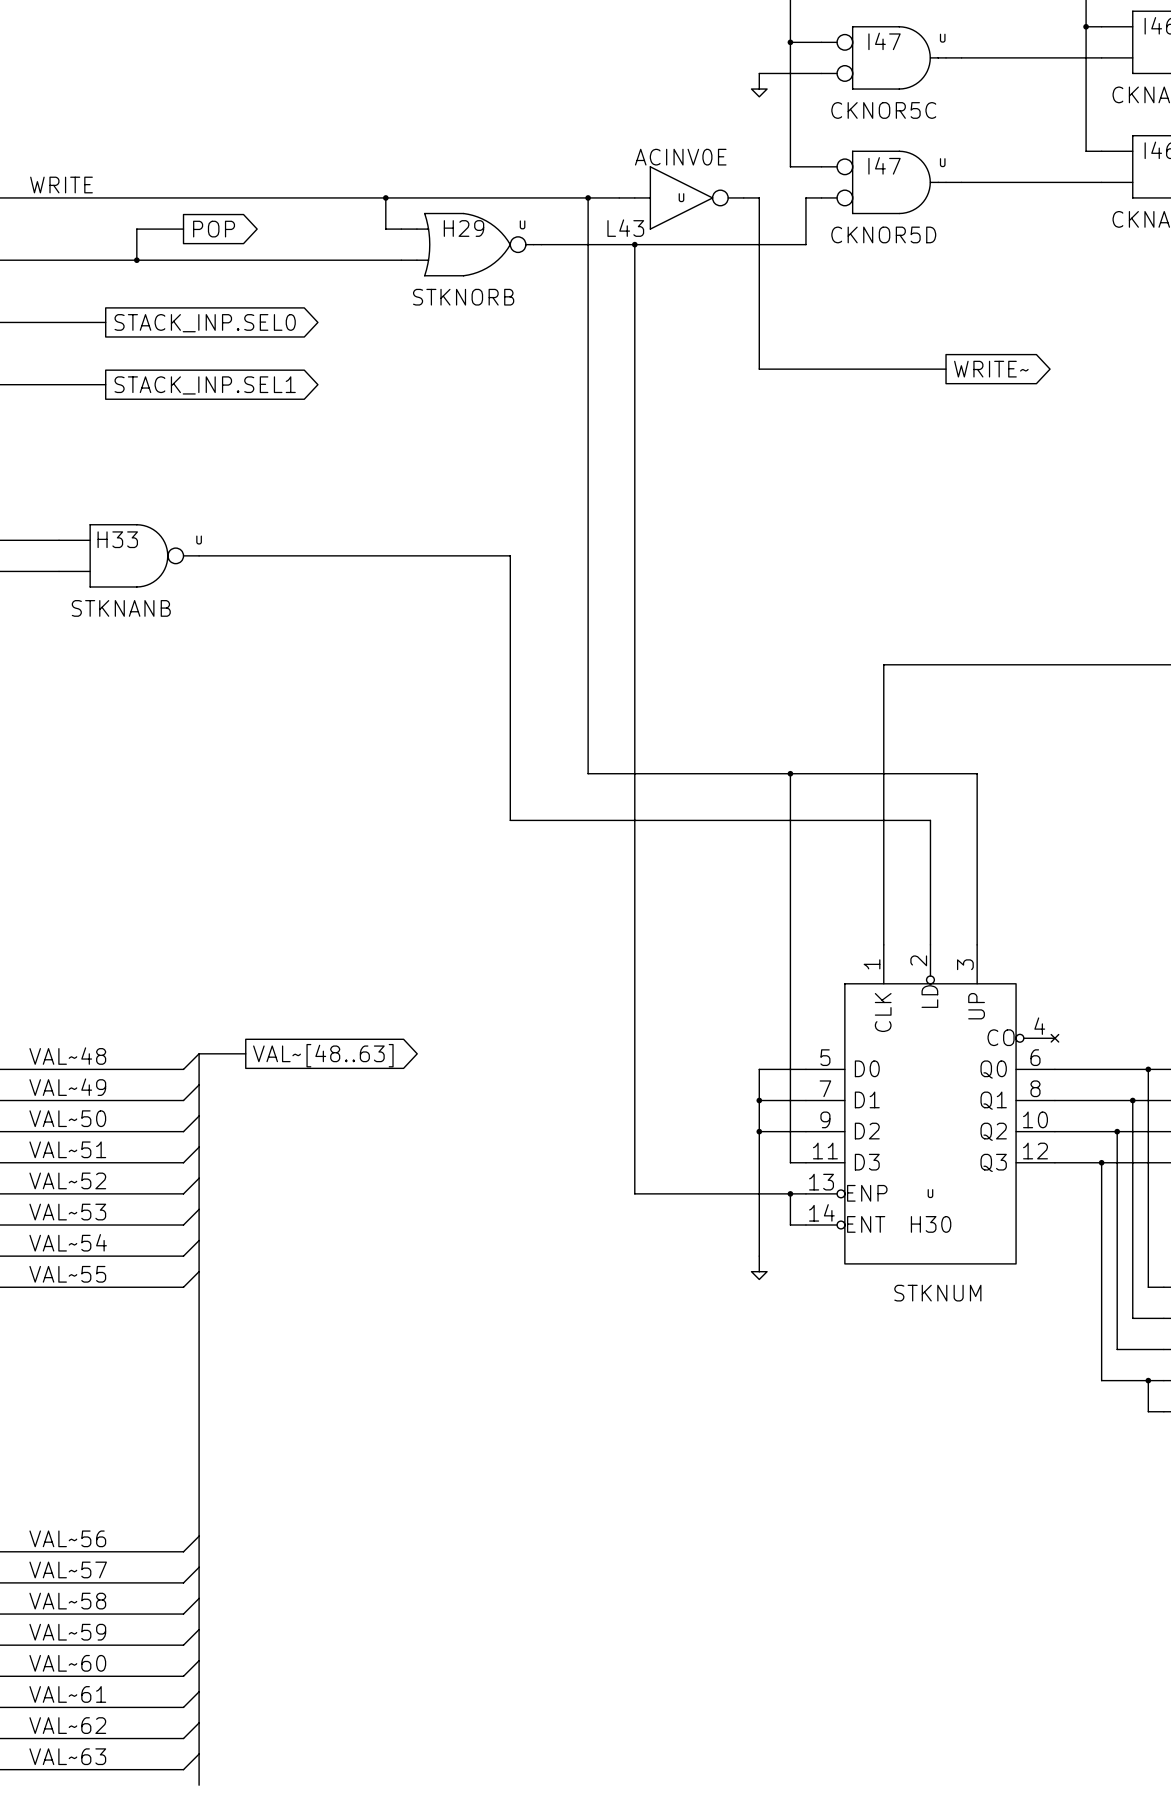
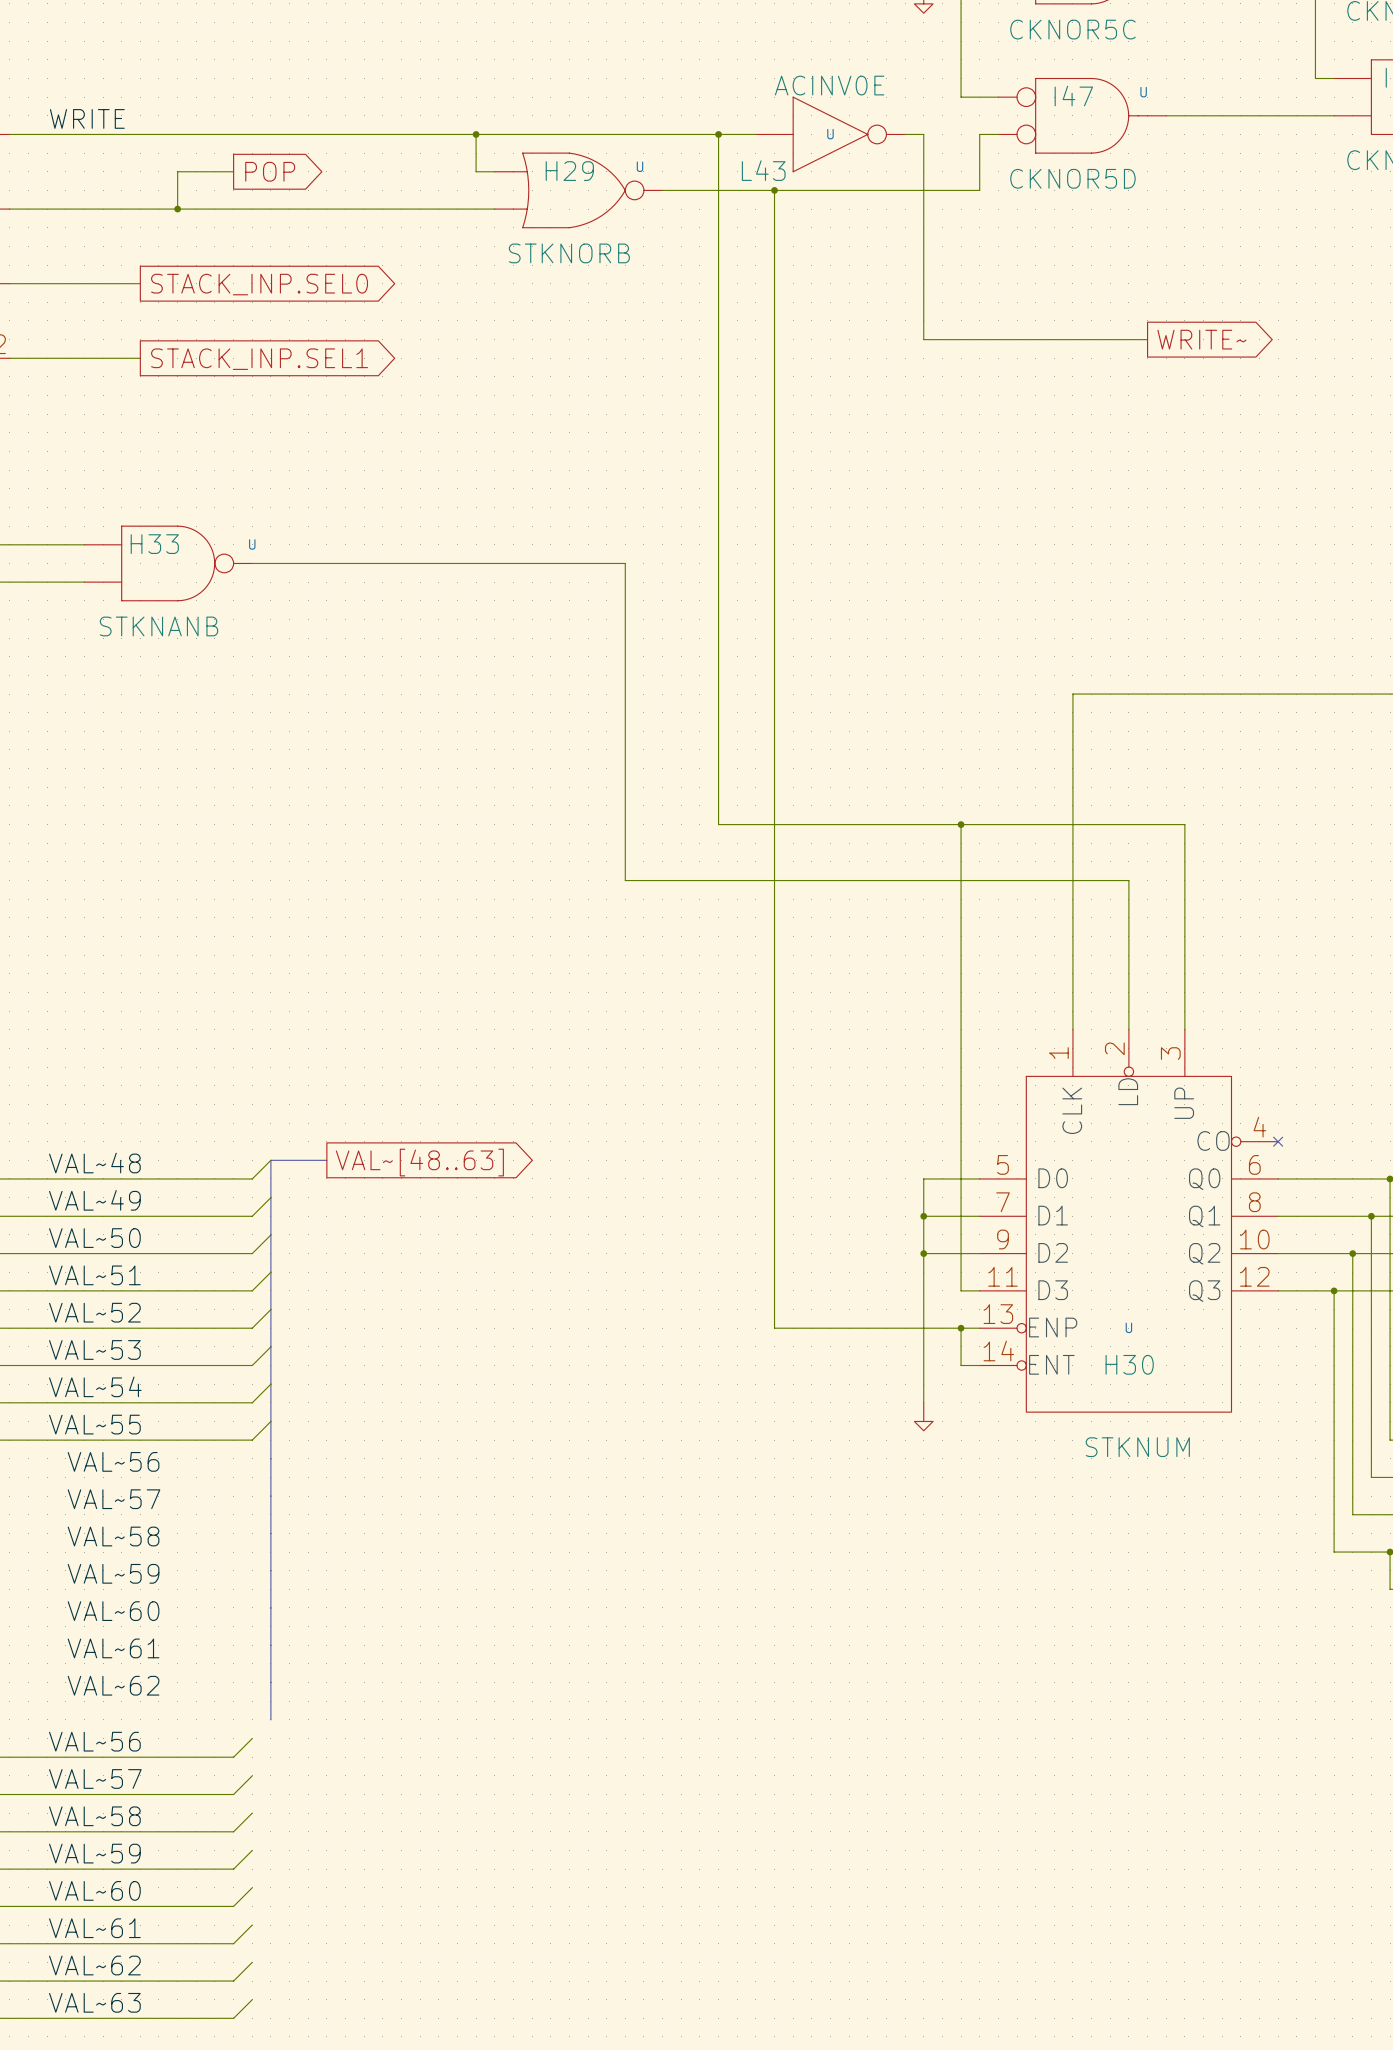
wire: (199, 1053) (183, 1069) -> (270, 1160) (252, 1178) (233, 1178)
bus: (214, 1053) (199, 1053) (199, 1785) -> (270, 1160) (270, 1719)
bus: none -> (308, 1160) (326, 1160)
global label position: VAL~[48..63] (323, 1055) -> VAL~[48..63] (419, 1162)
wire: (199, 1084) (183, 1100) -> (270, 1197) (252, 1216) (233, 1216)
wire: (199, 1116) (183, 1131) -> (270, 1234) (252, 1253) (233, 1253)
wire: (199, 1147) (183, 1162) -> (270, 1272) (252, 1290) (233, 1290)
wire: (199, 1178) (183, 1193) -> (270, 1309) (252, 1328) (233, 1328)
wire: (199, 1209) (183, 1225) -> (270, 1346) (252, 1365) (233, 1365)
wire: (199, 1240) (183, 1256) -> (270, 1384) (252, 1402) (233, 1402)
wire: (199, 1271) (183, 1287) -> (270, 1421) (252, 1440) (233, 1440)
label: none -> VAL~56 (113, 1461)
label: none -> VAL~57 (113, 1499)
label: none -> VAL~58 (113, 1536)
label: none -> VAL~59 (113, 1573)
label: none -> VAL~60 (113, 1611)
label: none -> VAL~61 (113, 1648)
label: none -> VAL~62 (113, 1685)

